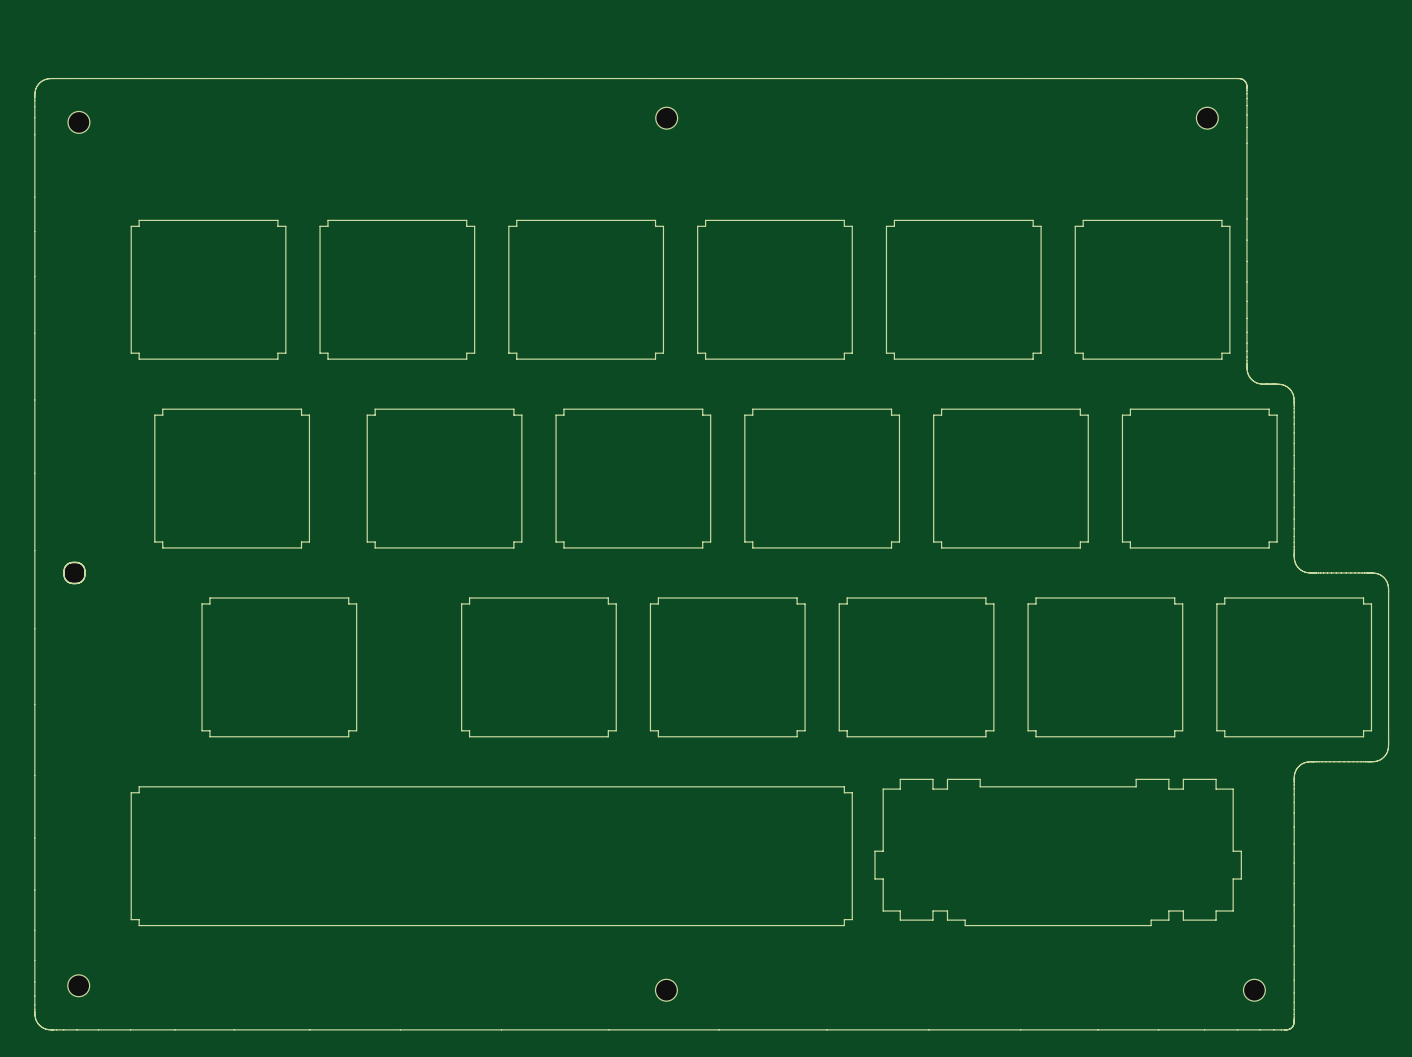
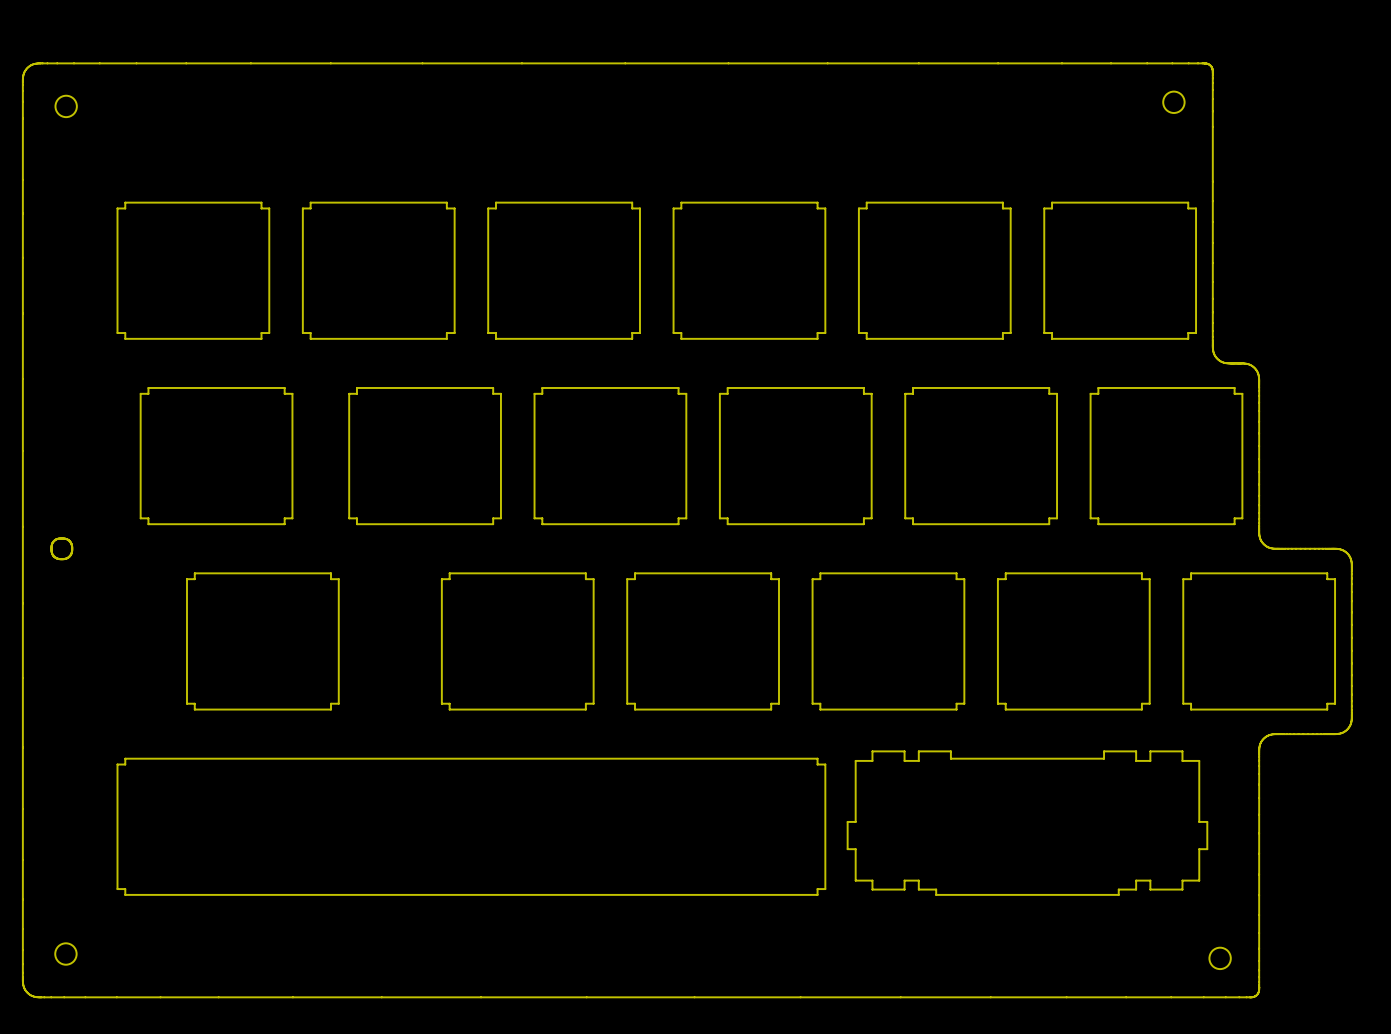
part: (666, 118) -> none
part: (666, 990) -> none

